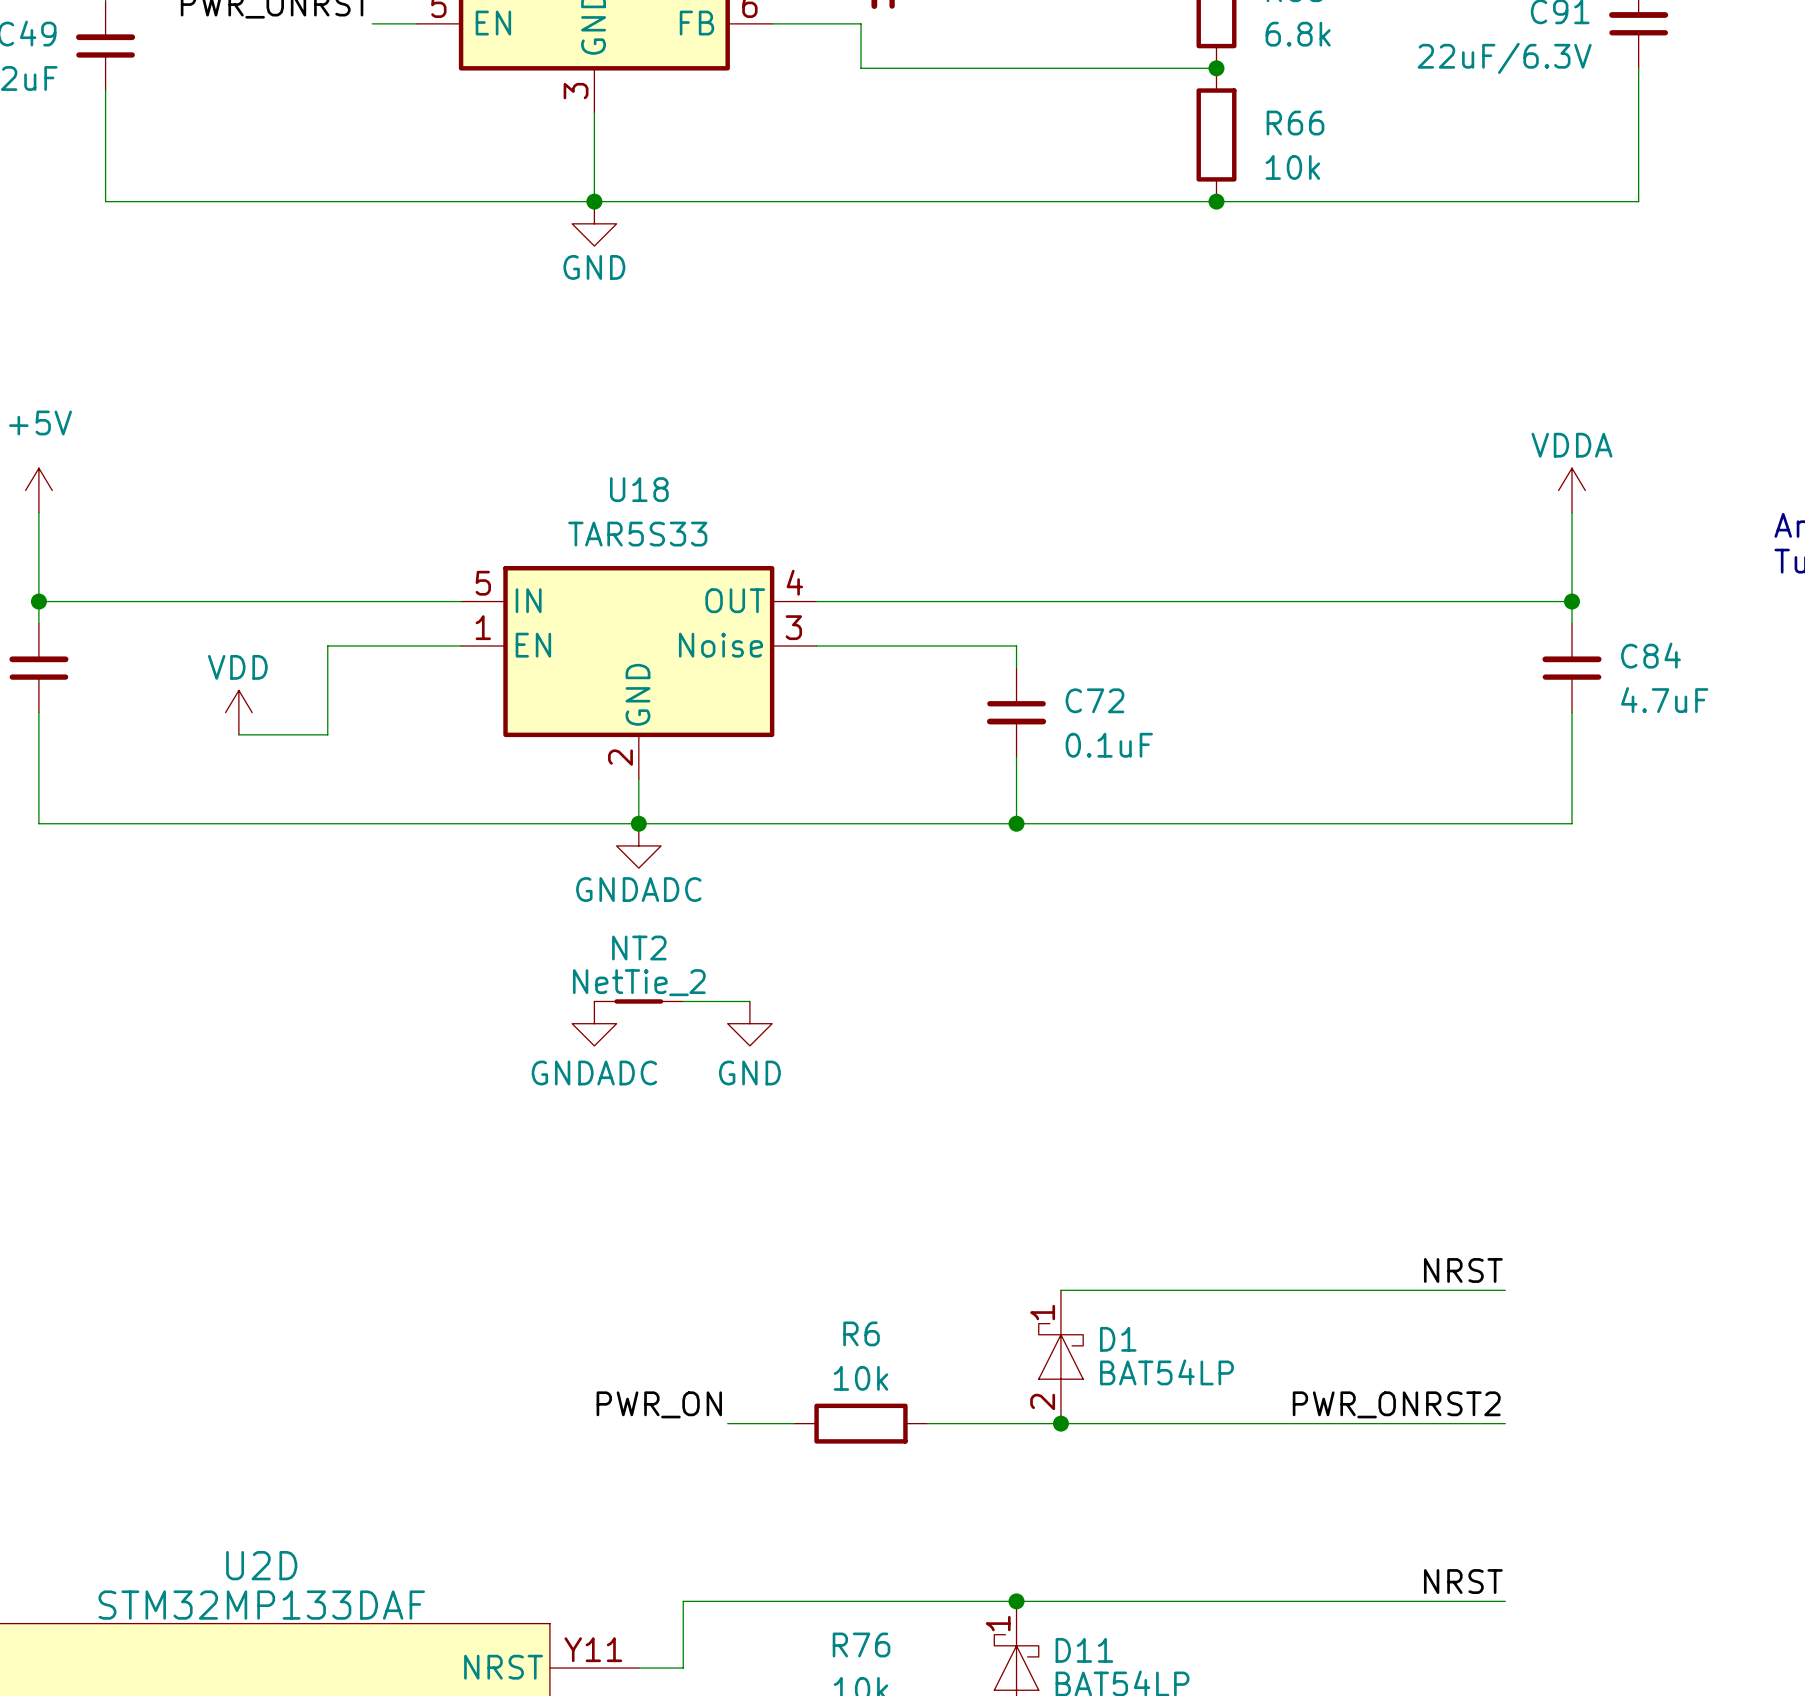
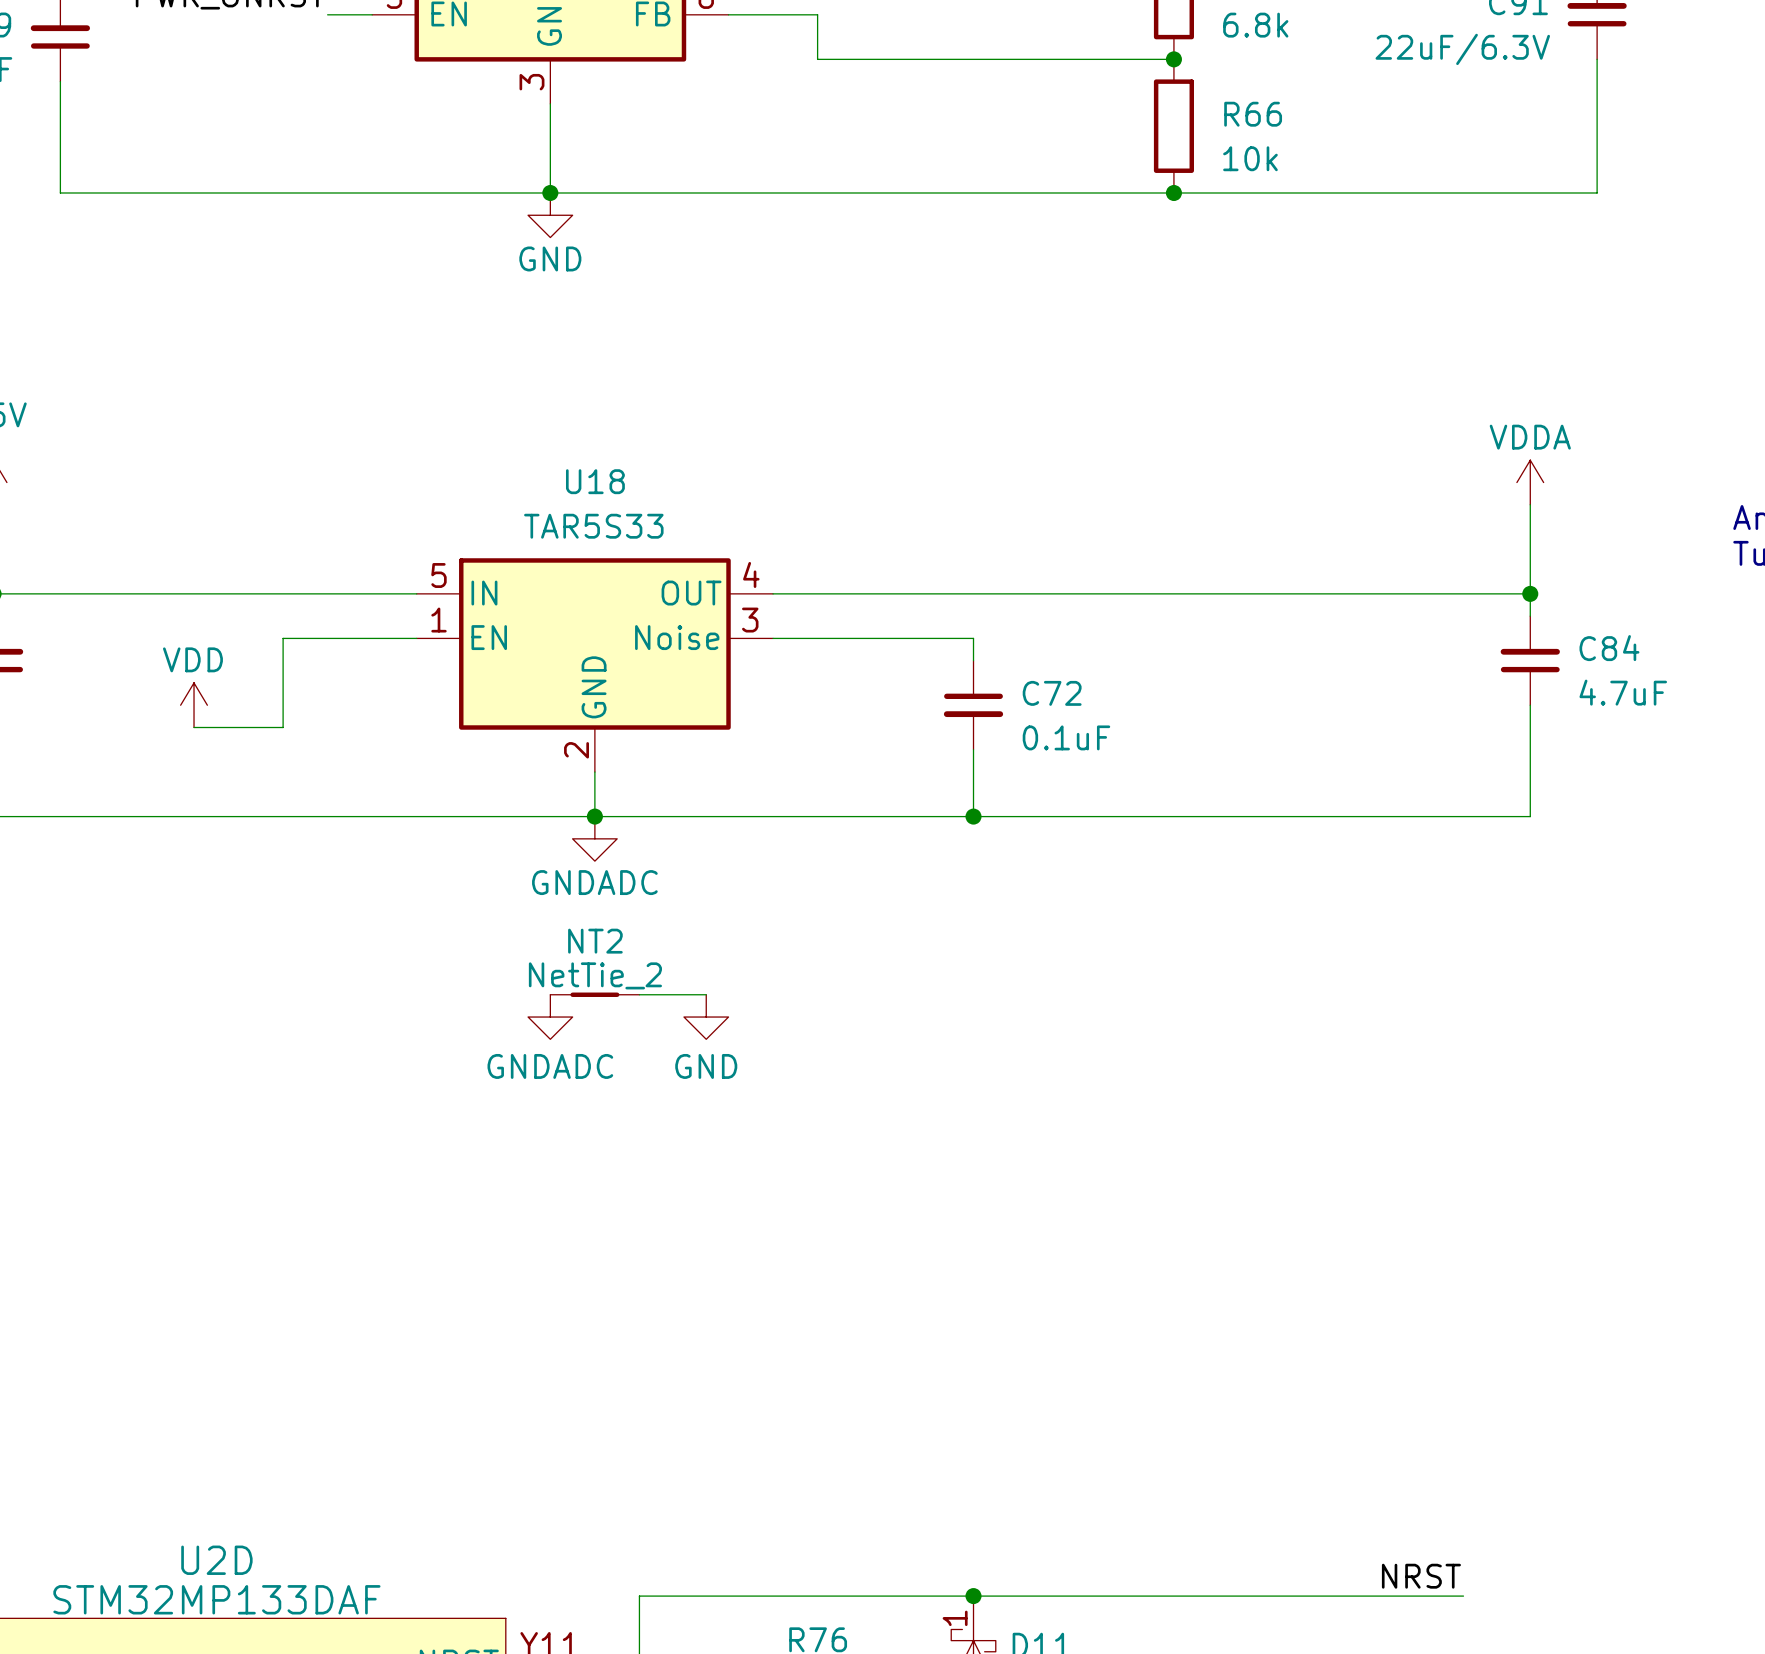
label: NRST (1463, 1270) -> none
wire: (1060, 1290) (1505, 1290) -> none
D1: BAT54LP (1060, 1356) -> none
label: PWR_ON (659, 1404) -> none
label: PWR_ONRST2 (1396, 1404) -> none
wire: (727, 1423) (794, 1423) -> none
R6: (861, 1423) -> none
wire: (927, 1423) (1505, 1423) -> none
junction: (1060, 1423) -> none

